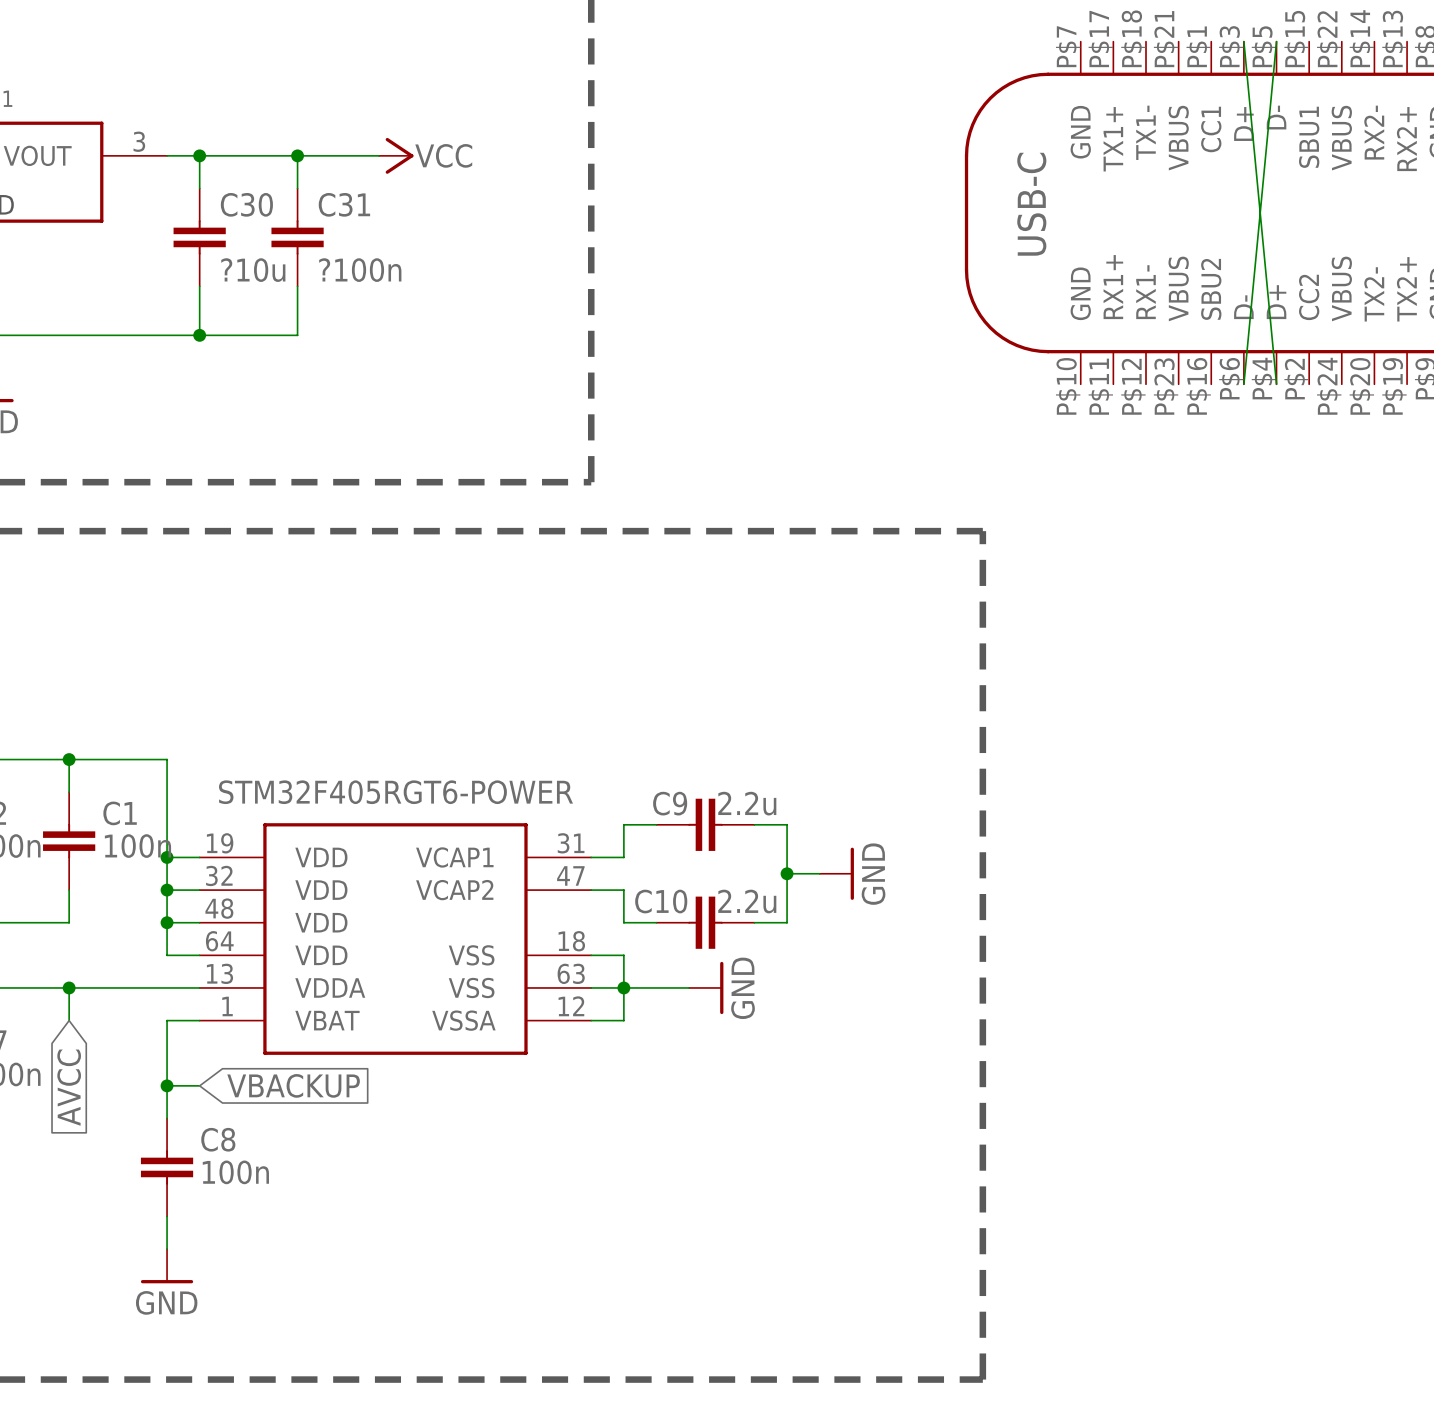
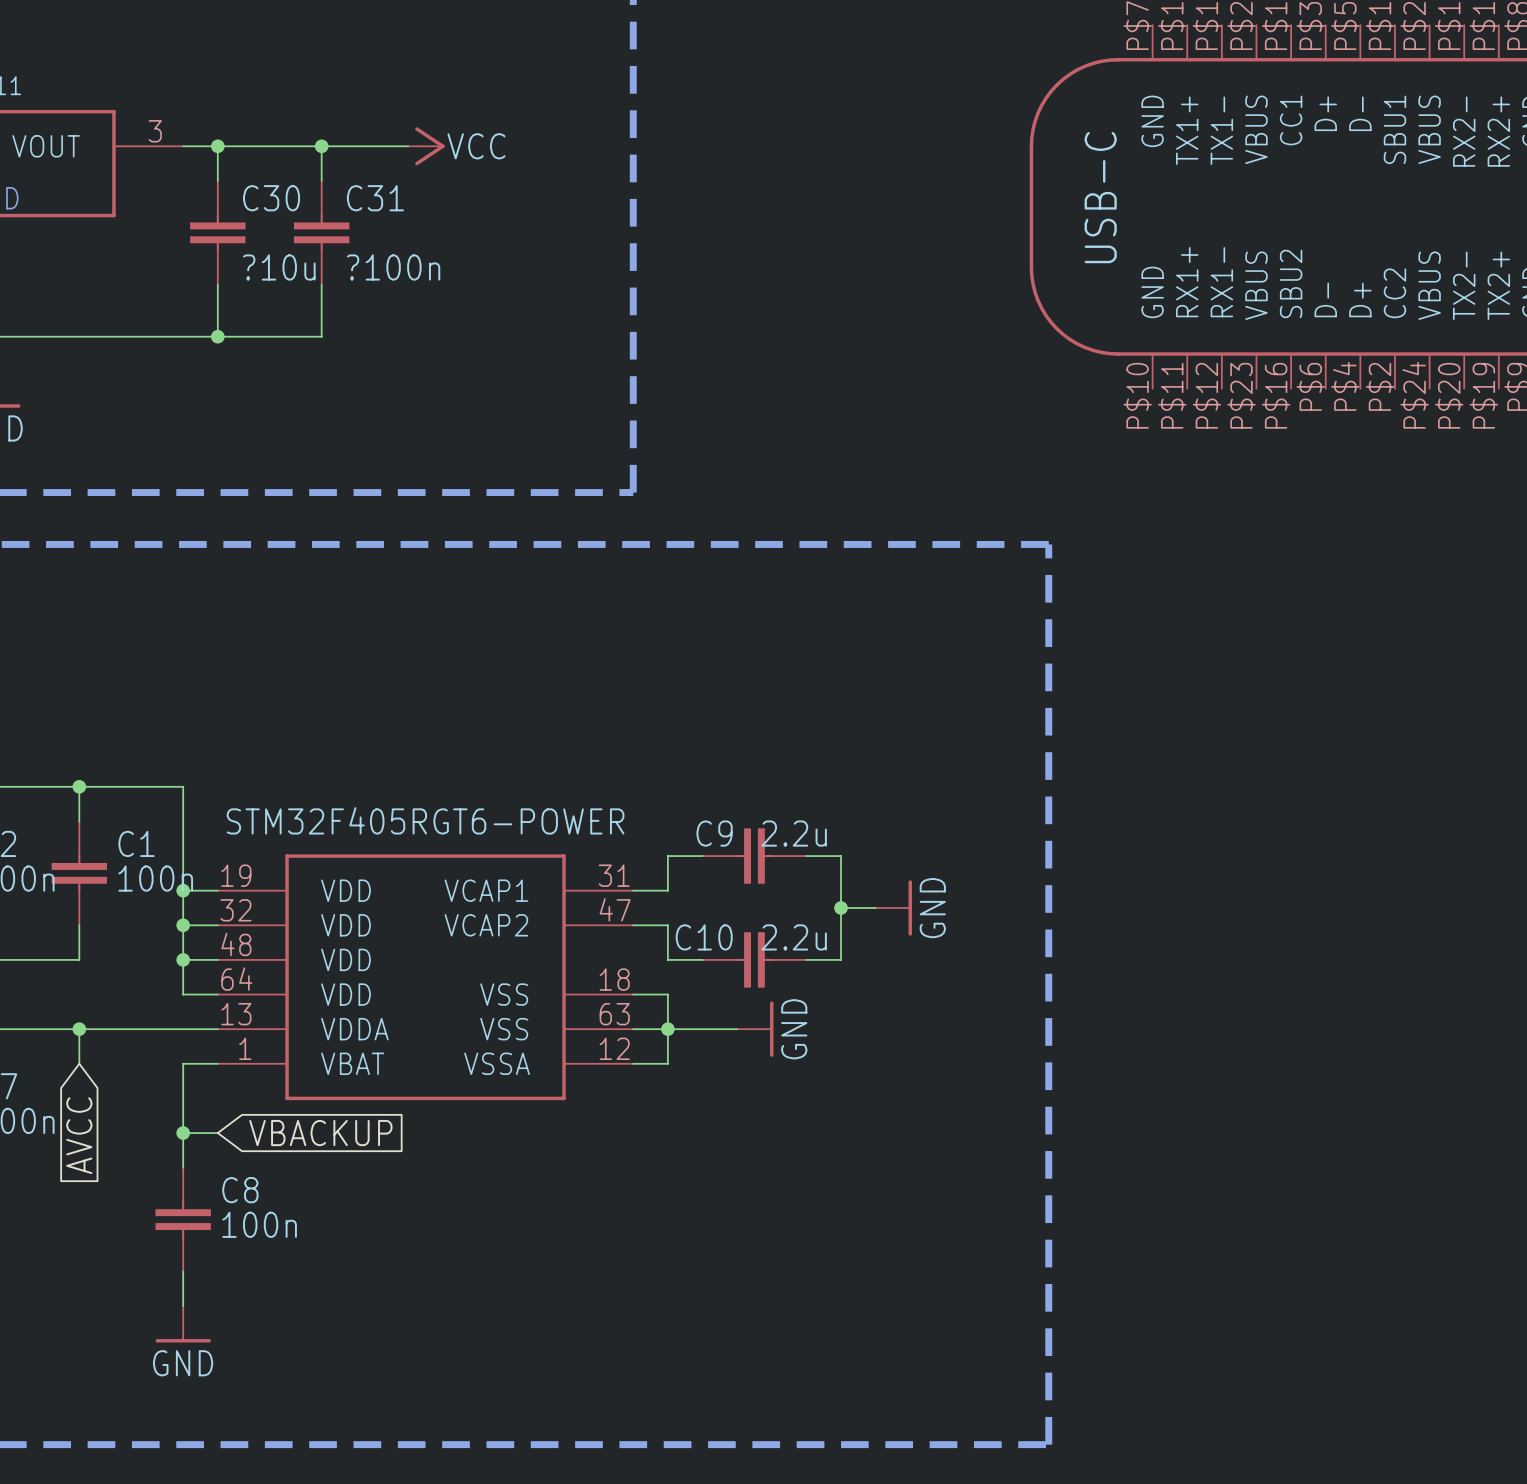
wire: (1243, 41) (1276, 384) -> none
wire: (1276, 41) (1243, 384) -> none

